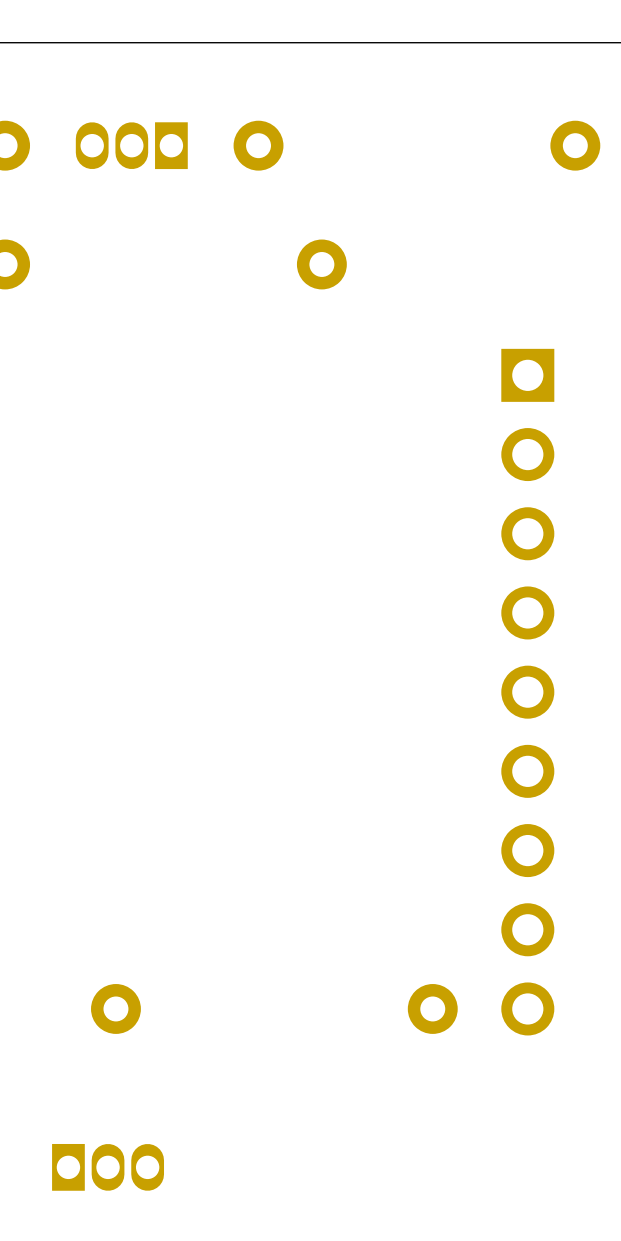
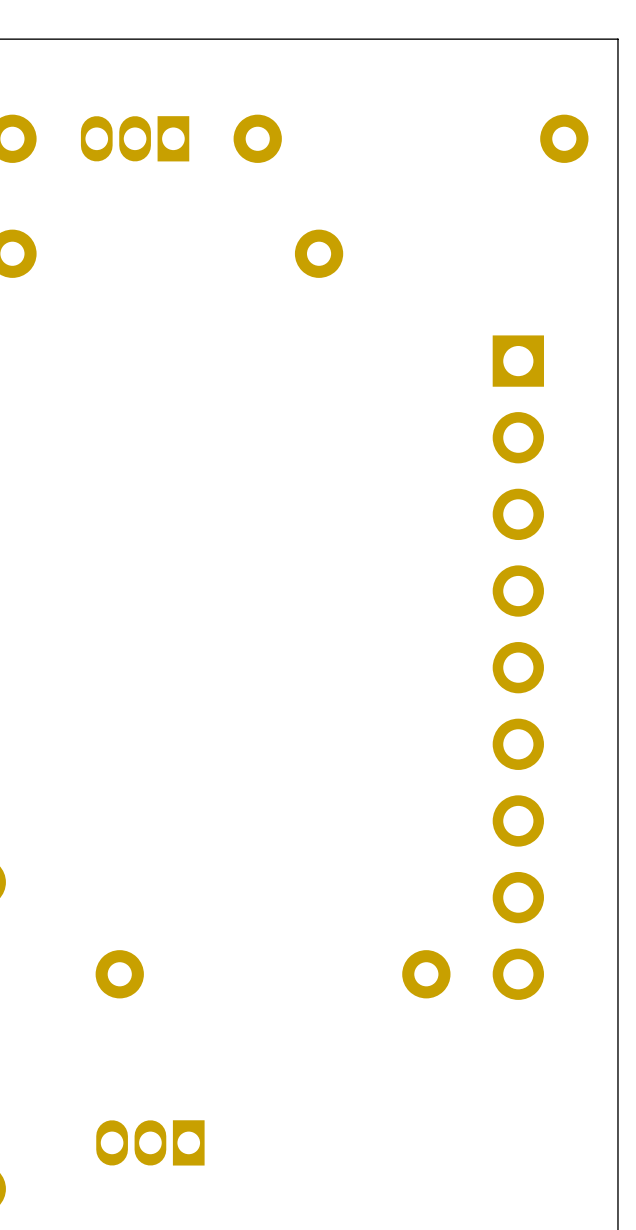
part rotation: 0° (108, 1167) -> 180° (150, 1142)

